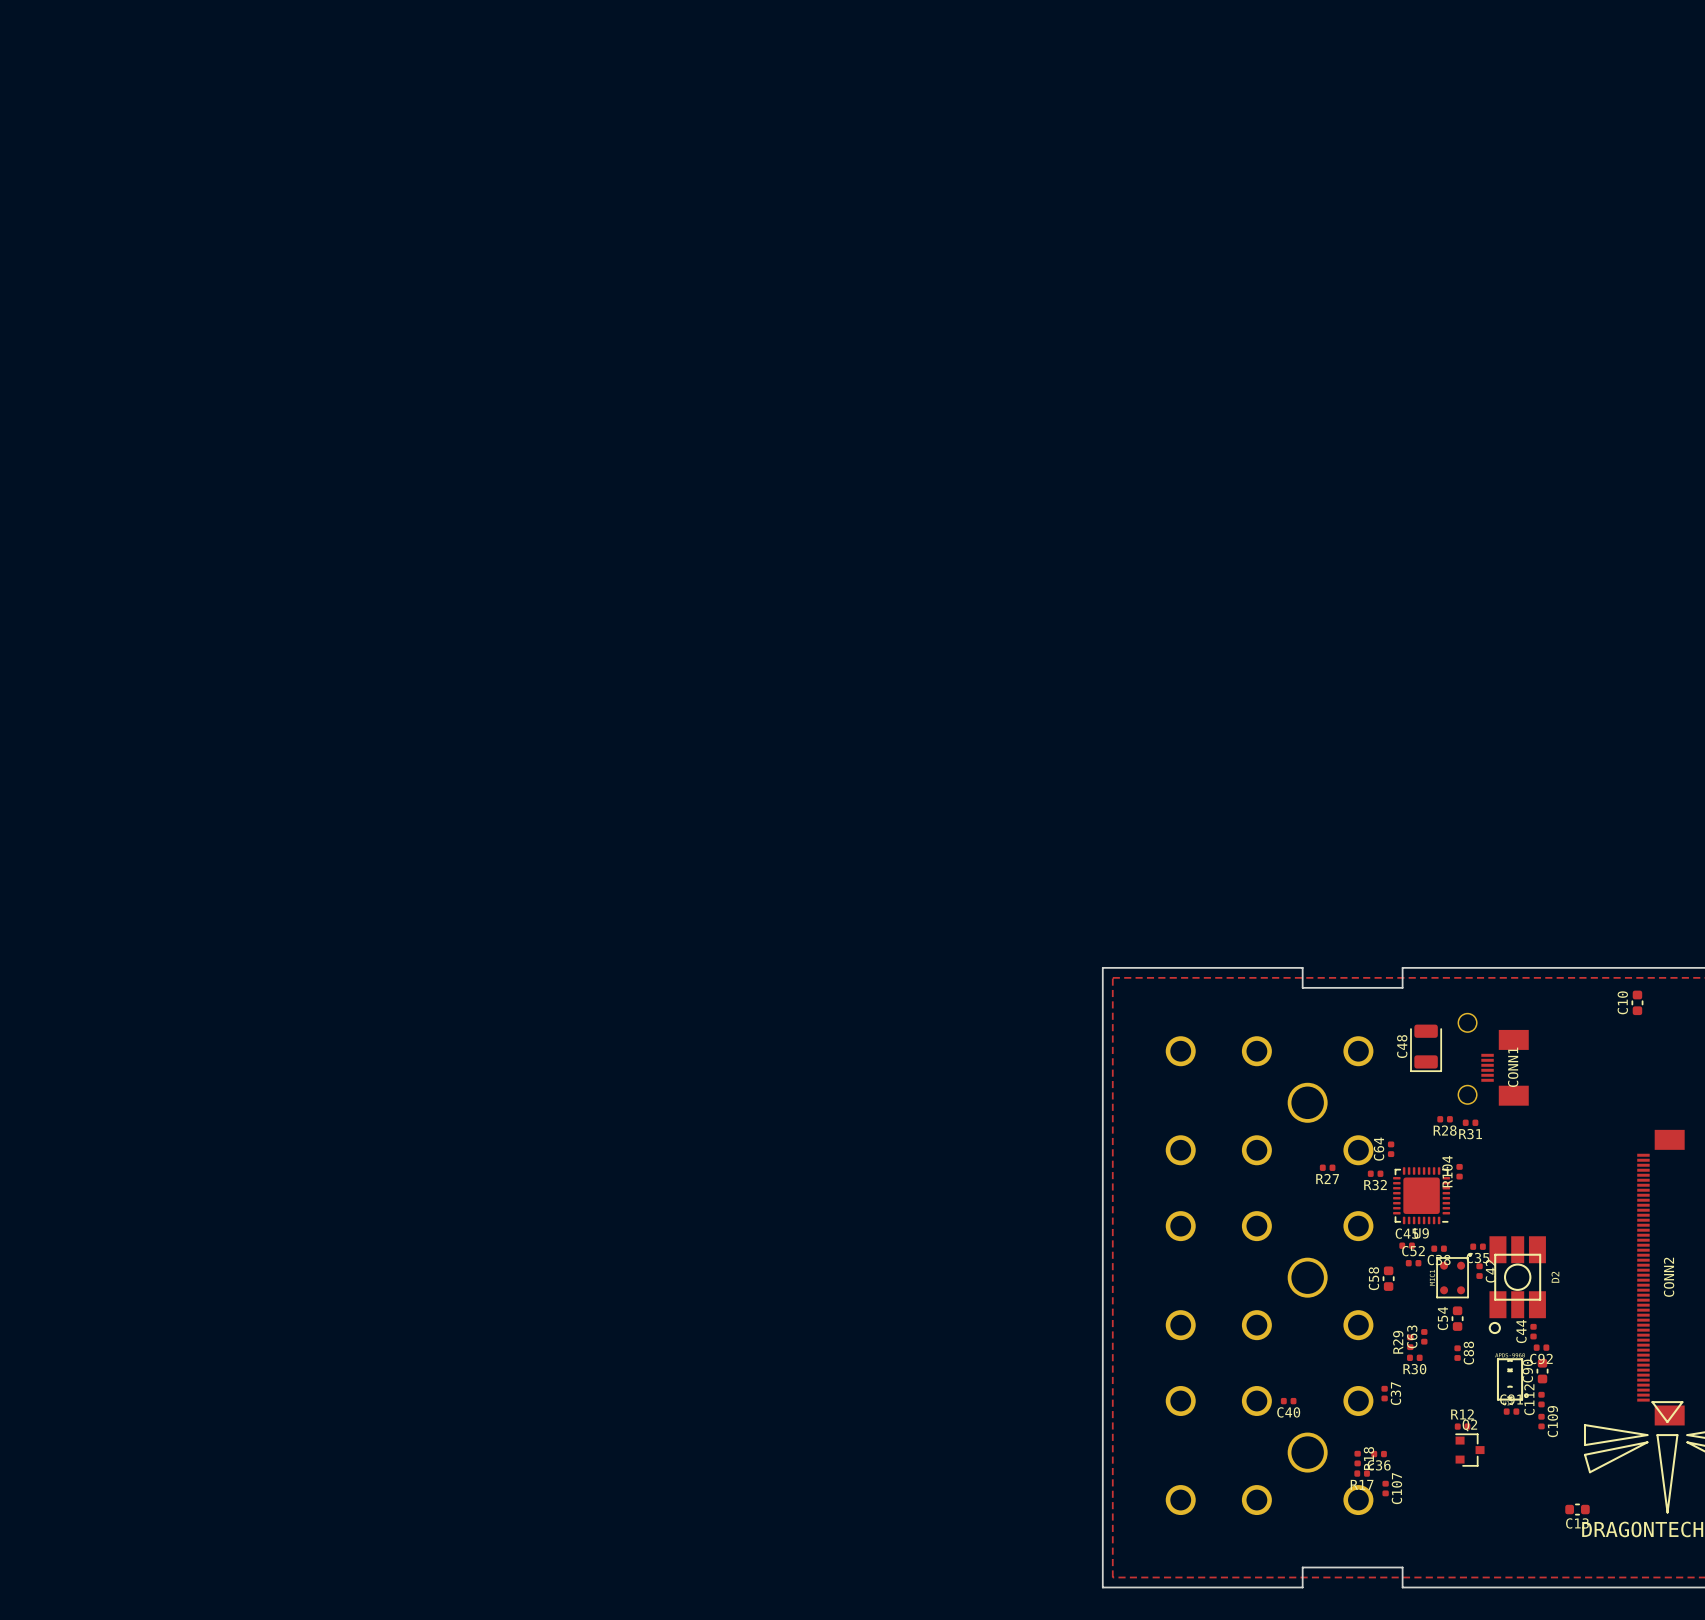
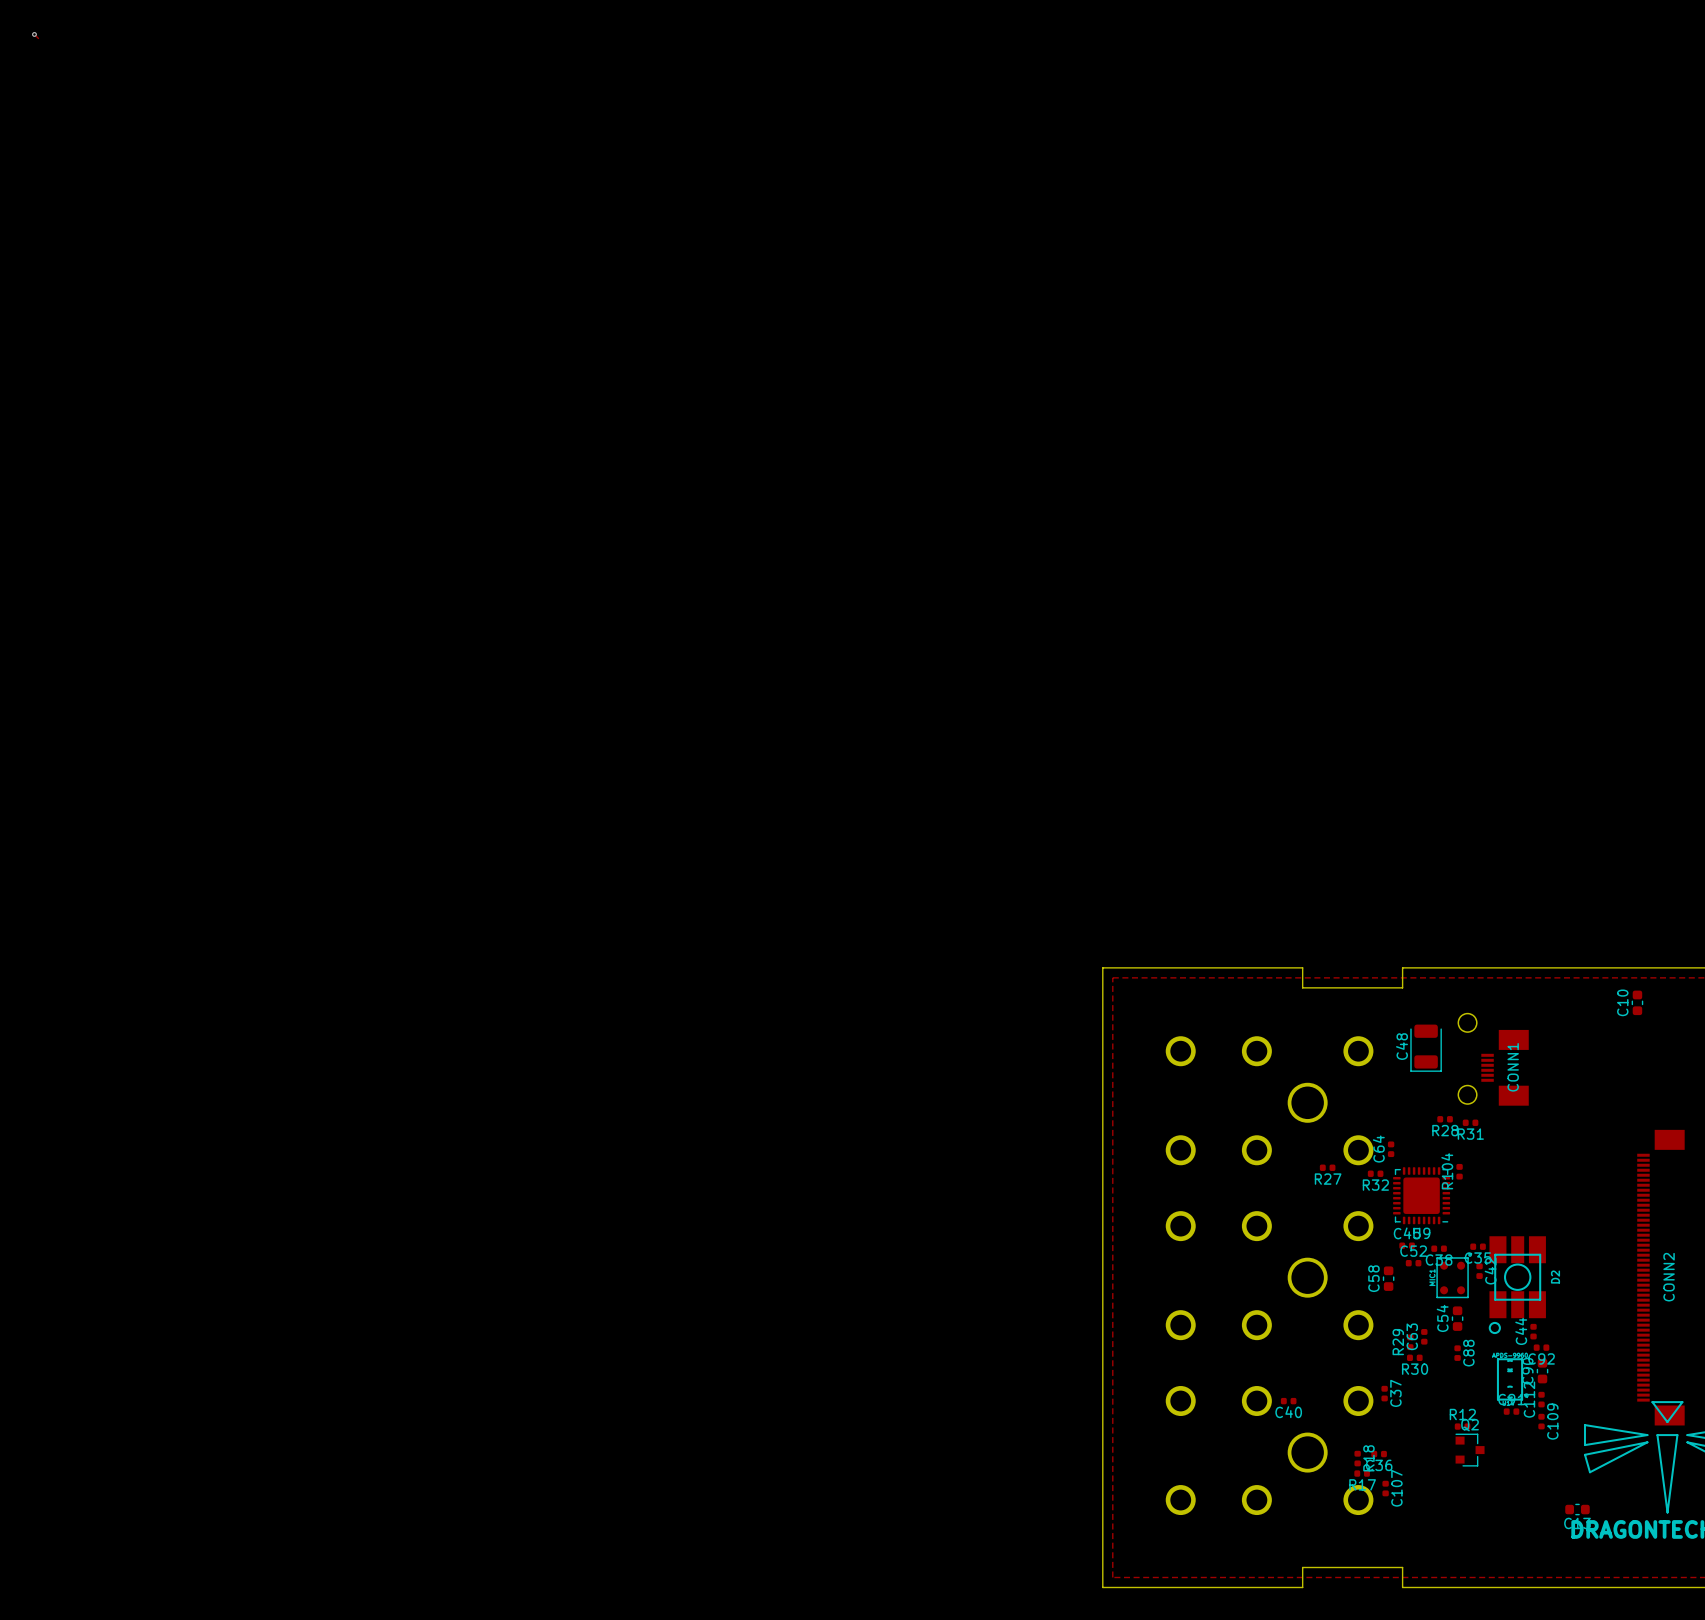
track: none -> (34, 34) (38, 38)
via: none -> (34, 34)

